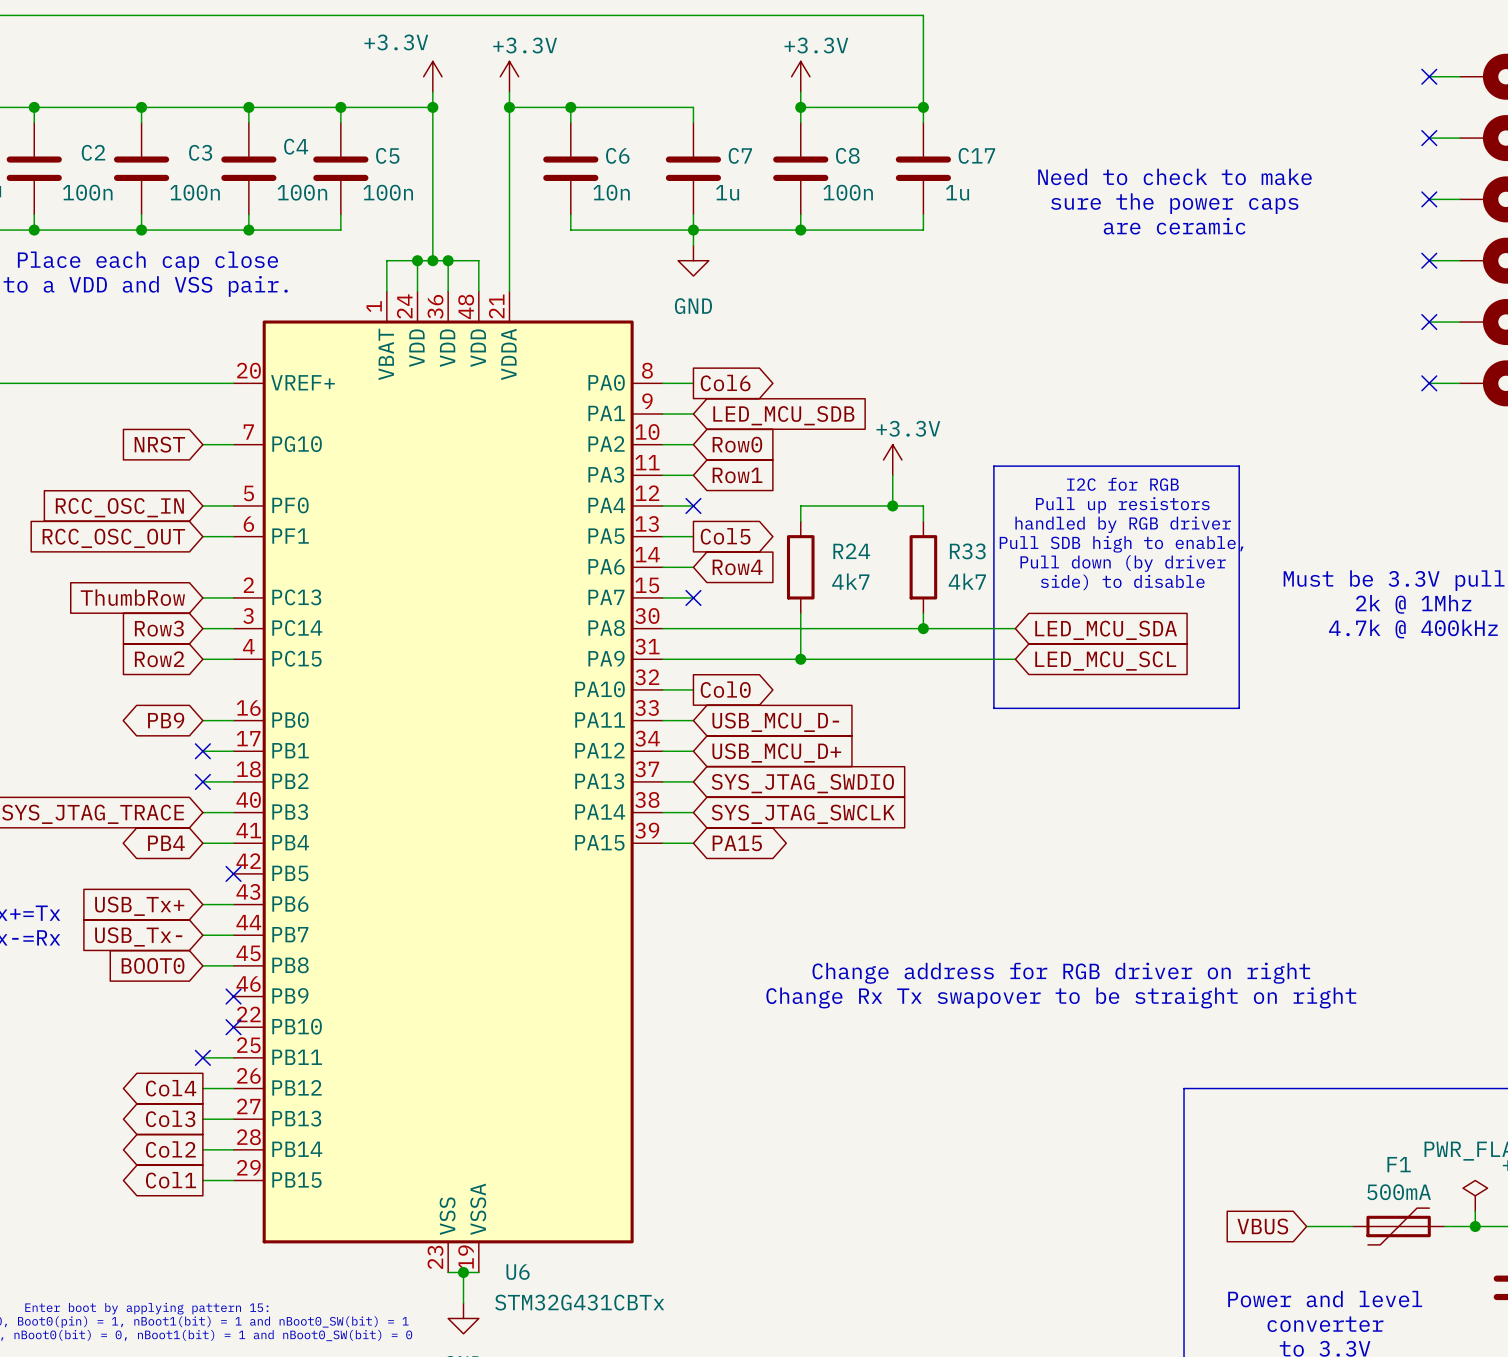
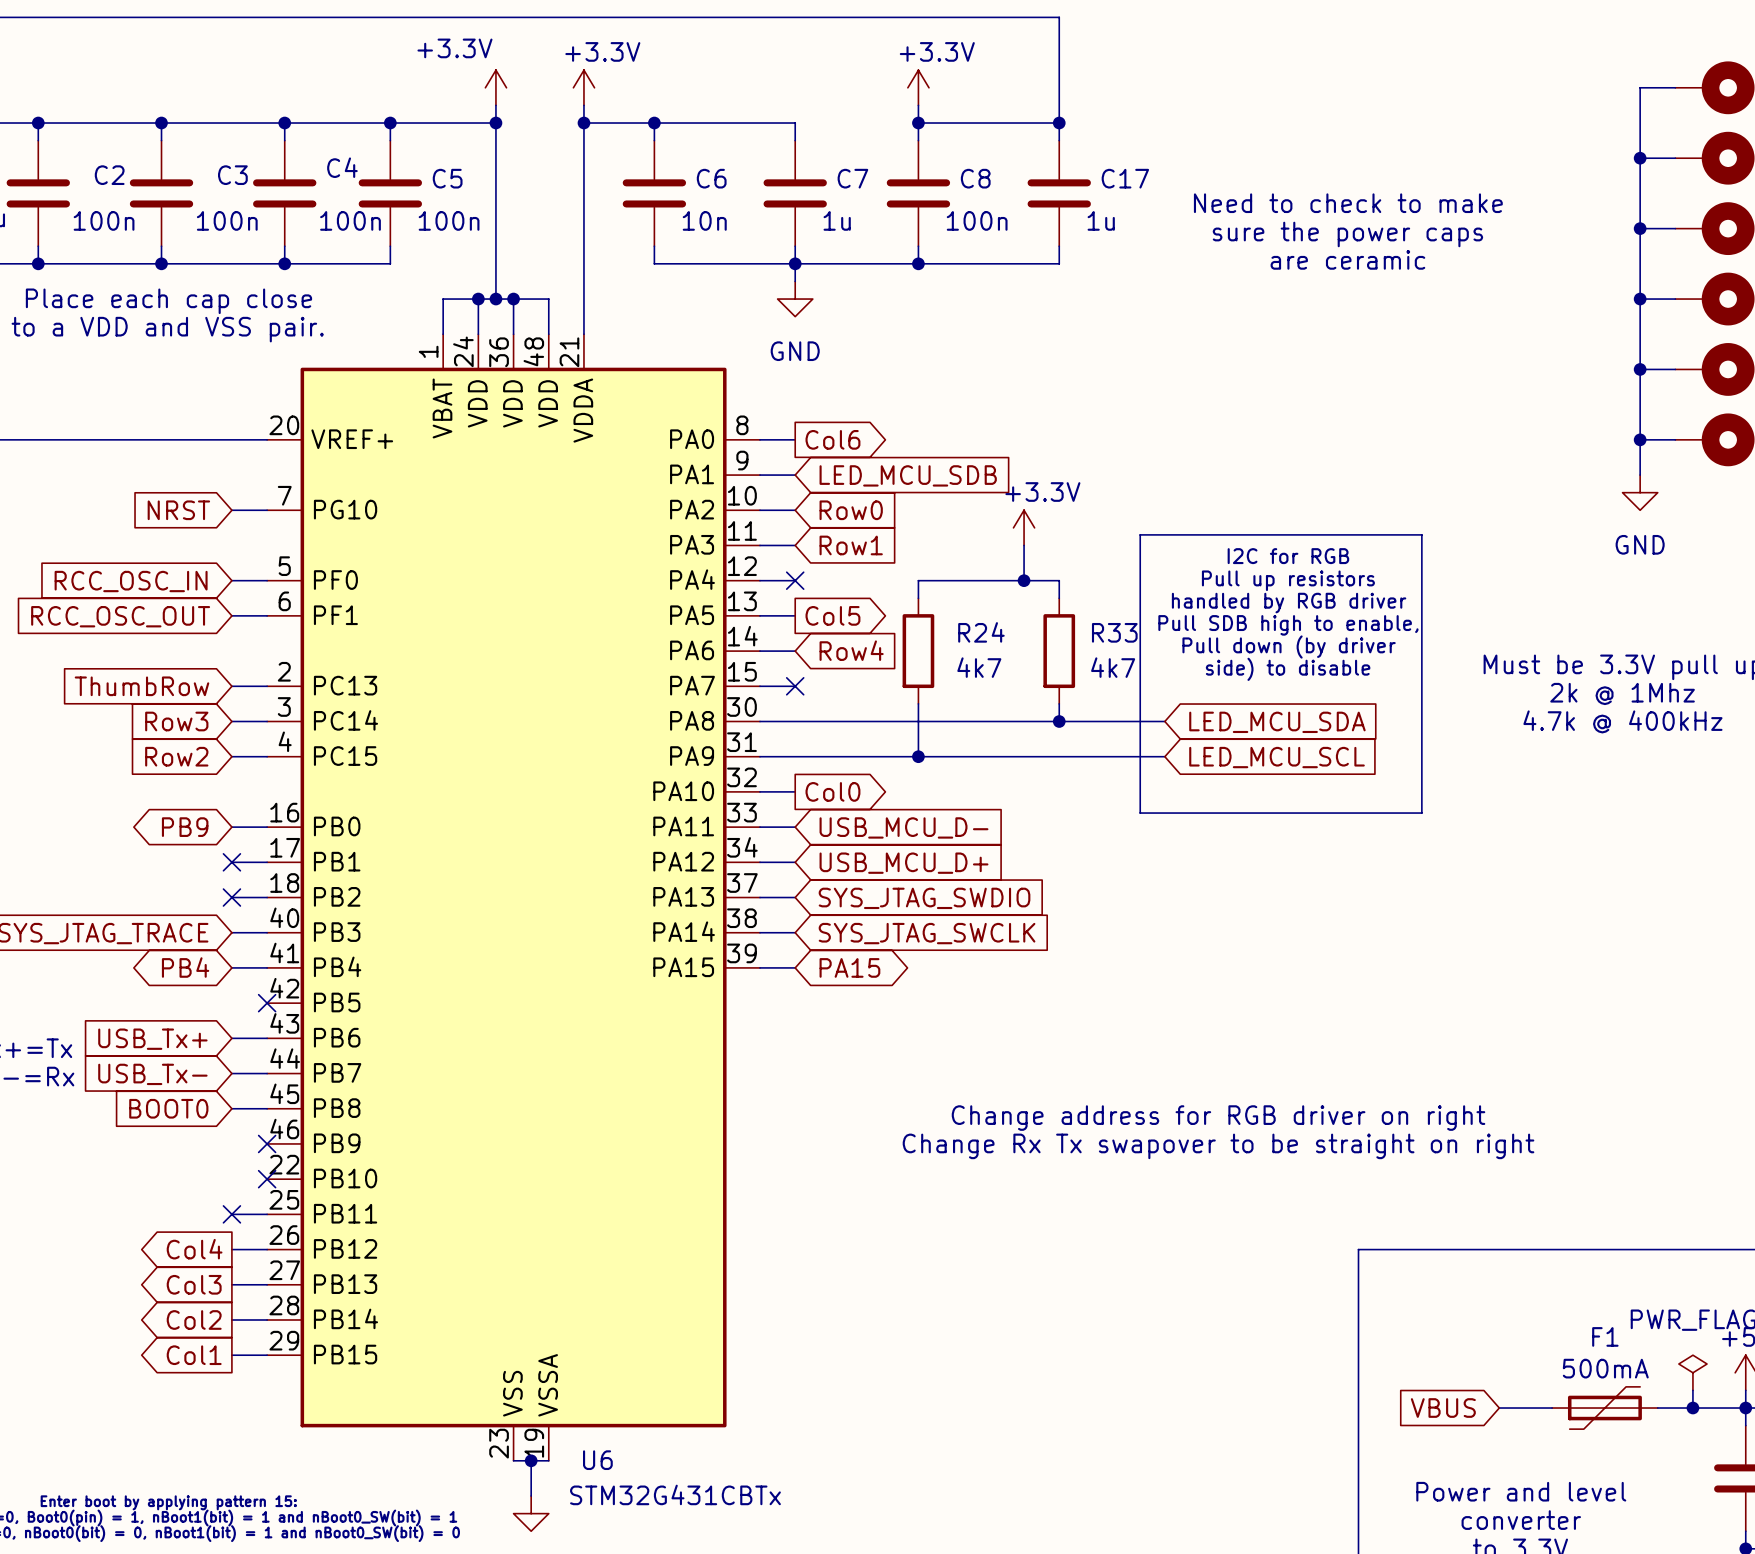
wire: none -> (1640, 87) (1640, 475)
no-connect mark: (1429, 76) -> none
no-connect mark: (1429, 138) -> none
junction: none -> (1640, 158)
no-connect mark: (1429, 199) -> none
junction: none -> (1640, 228)
no-connect mark: (1429, 260) -> none
junction: none -> (1640, 299)
no-connect mark: (1429, 322) -> none
junction: none -> (1640, 369)
no-connect mark: (1429, 383) -> none
junction: none -> (1640, 439)
power symbol: none -> GND (1640, 492)

